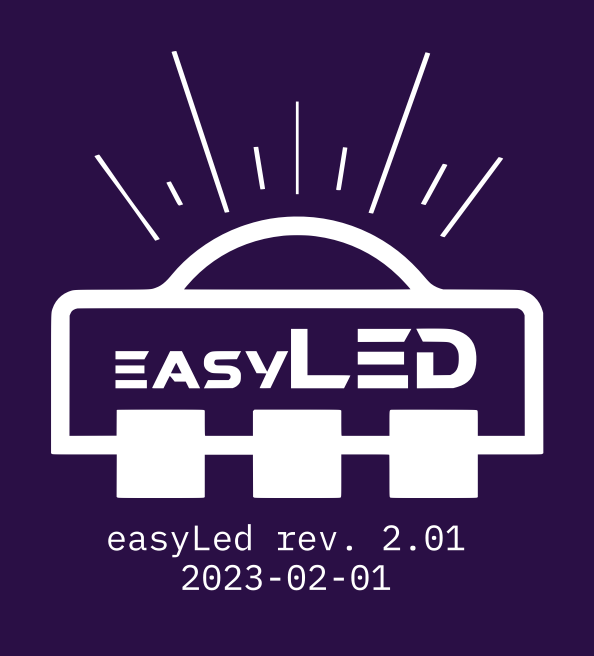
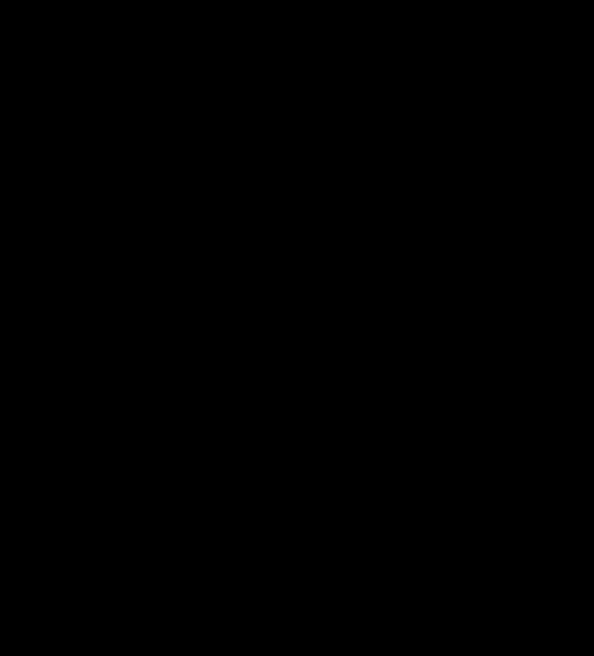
drawing: [51, 51, 544, 499] -> none
text: easyLed rev. 2.01 (286, 540) -> none
text: 2023-02-01 (286, 577) -> none

